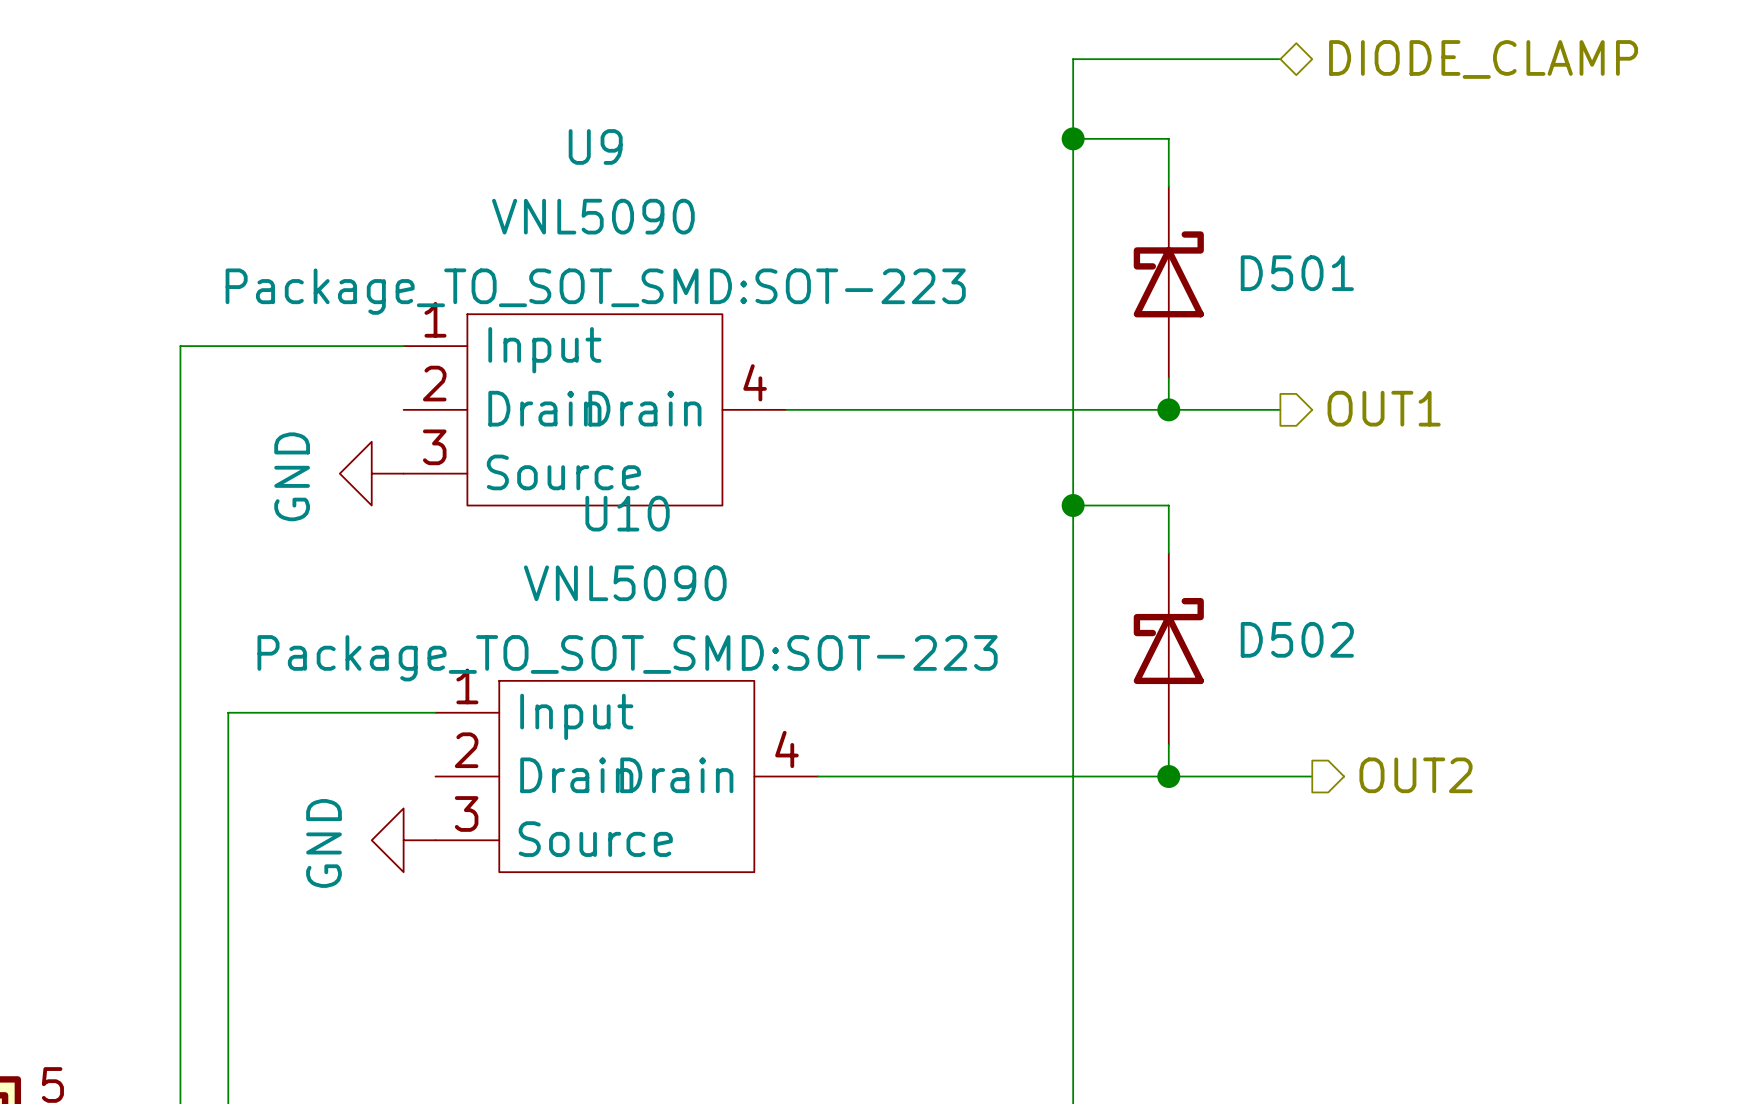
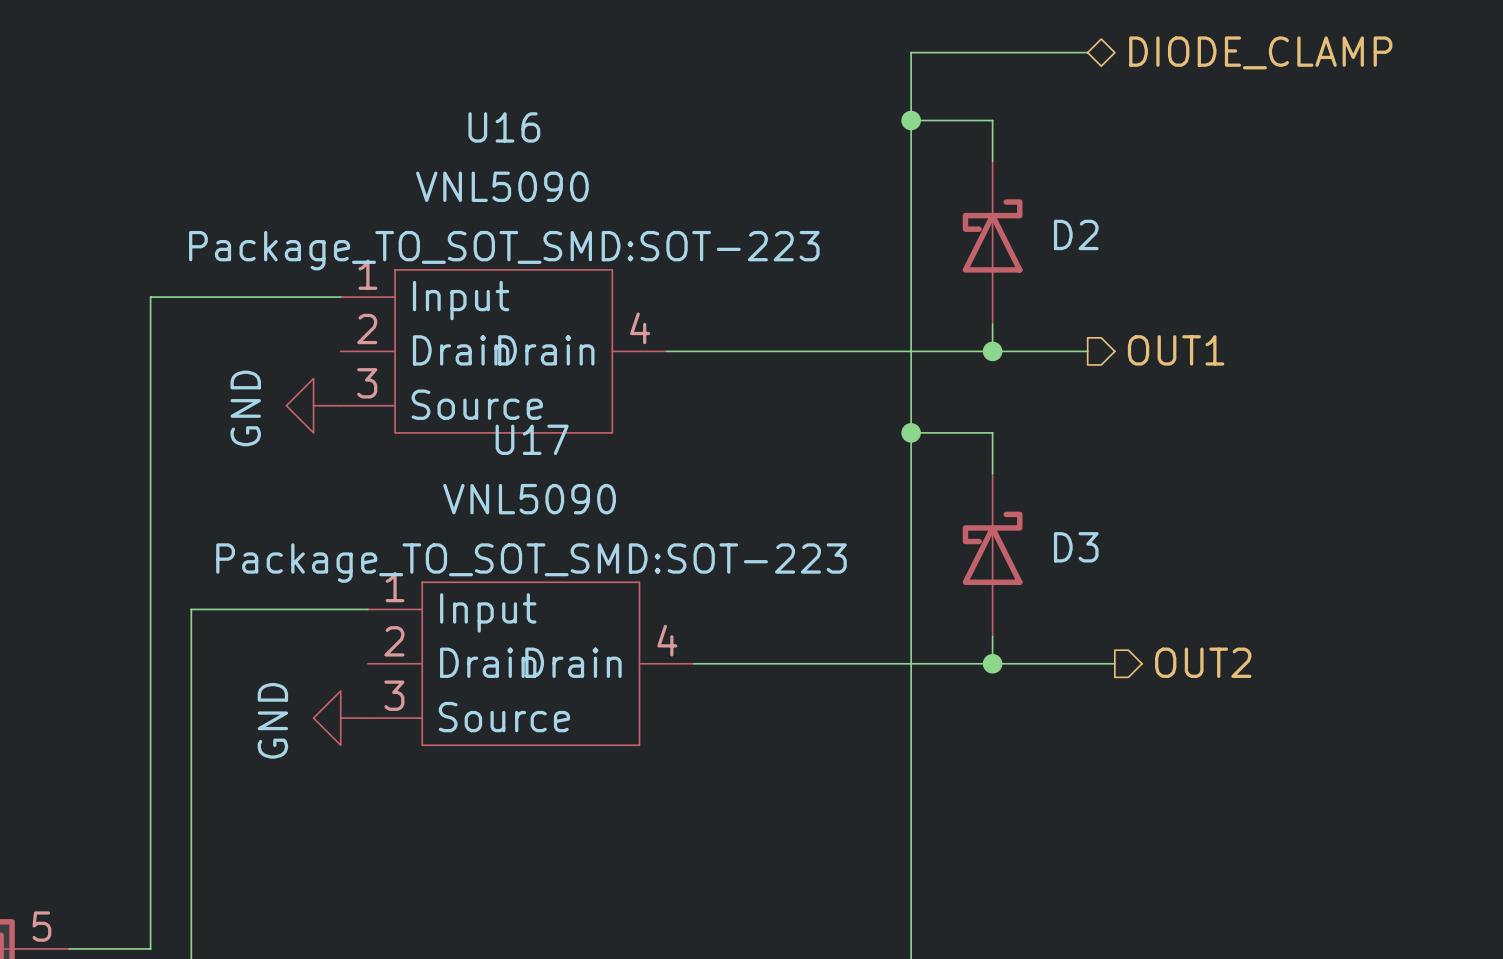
U9 name: U9 (595, 146) -> U16 (504, 127)
D501 name: D501 (1297, 273) -> D2 (1076, 234)
U10 name: U10 (627, 513) -> U17 (532, 439)
D502 name: D502 (1297, 639) -> D3 (1076, 547)

